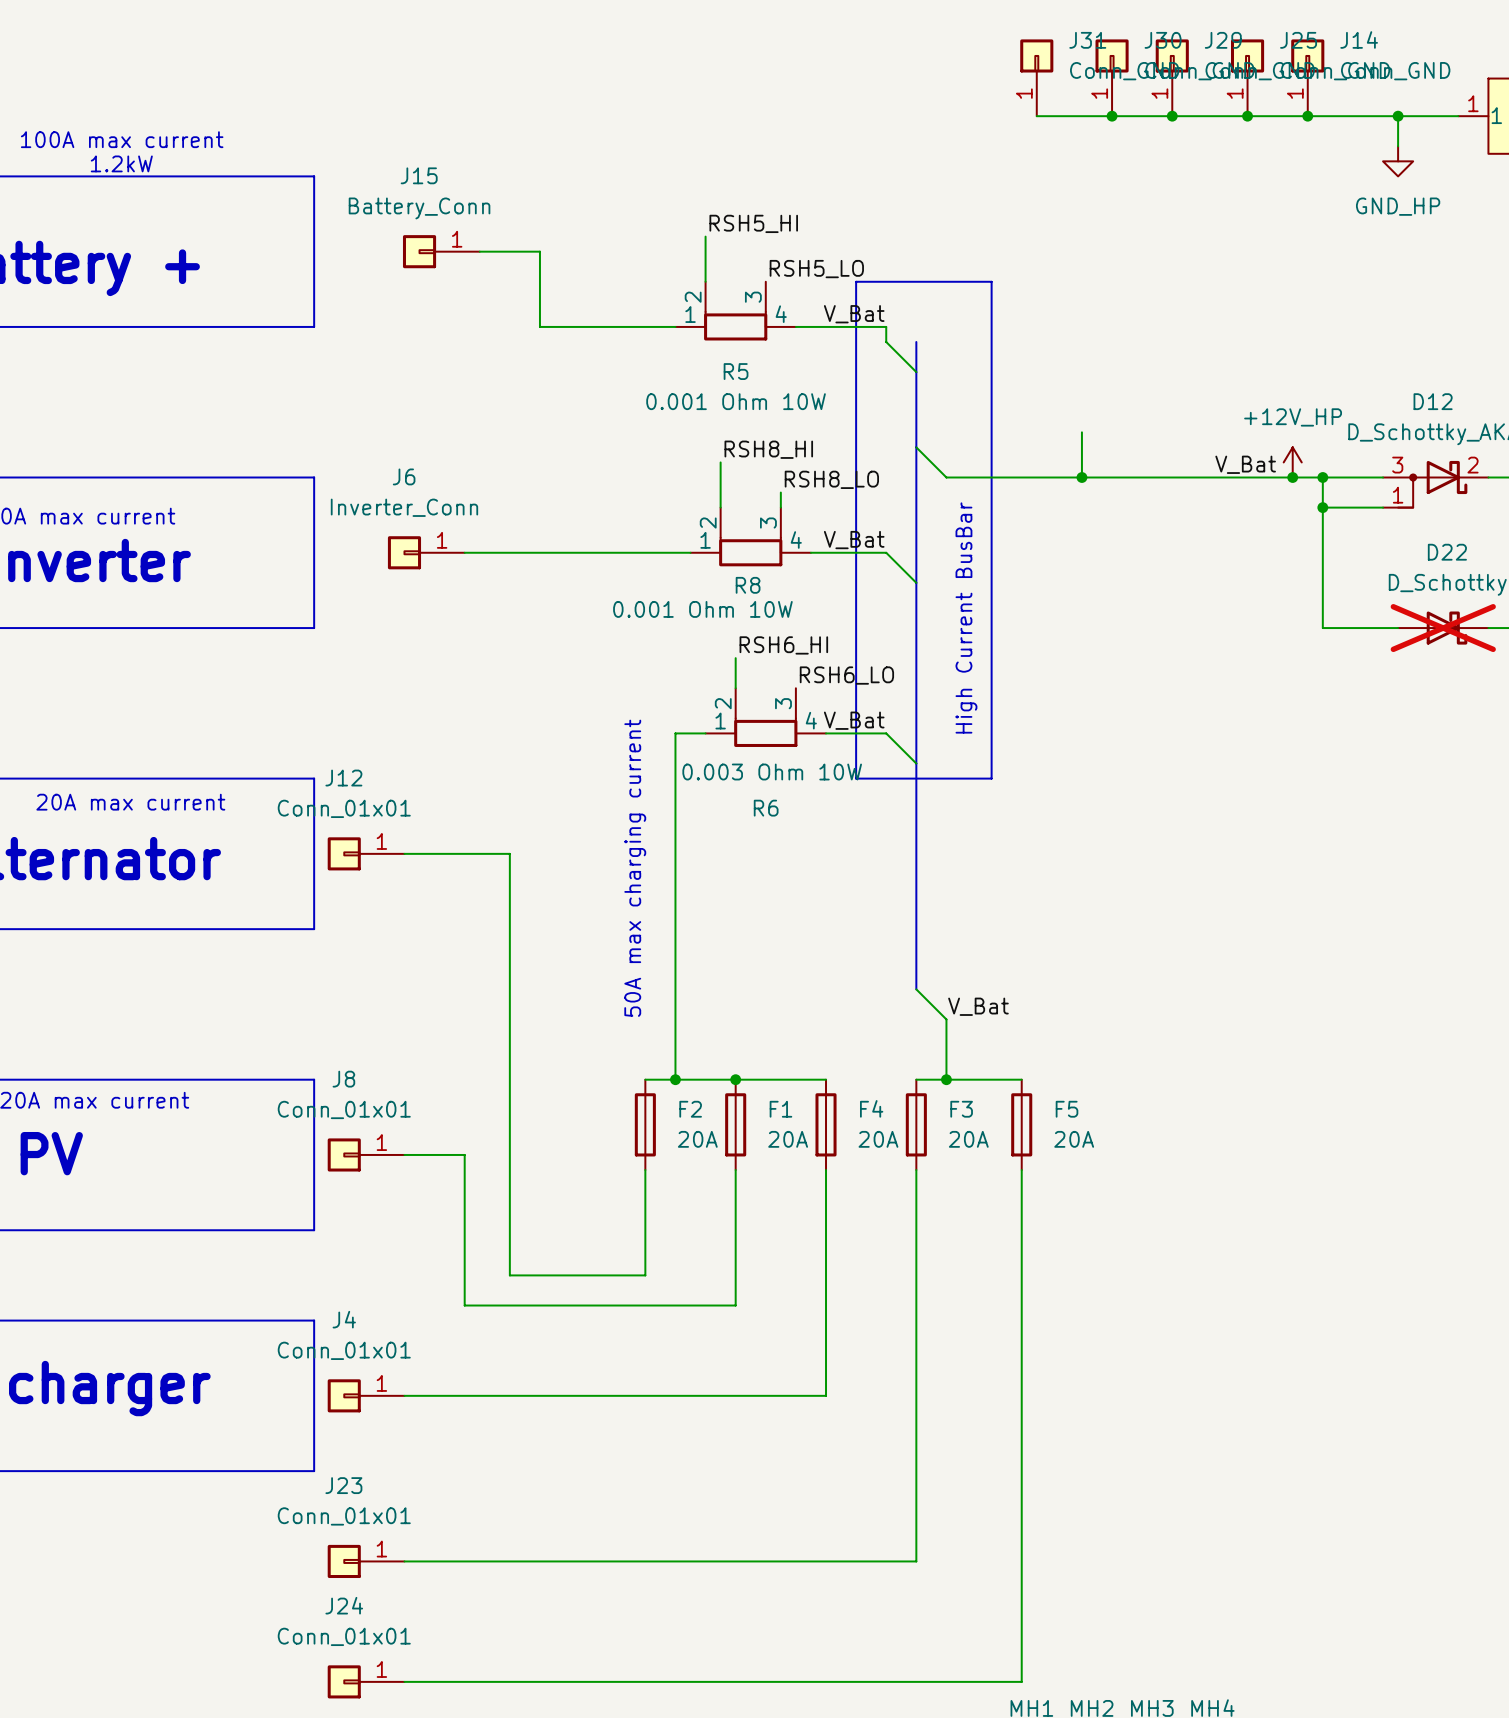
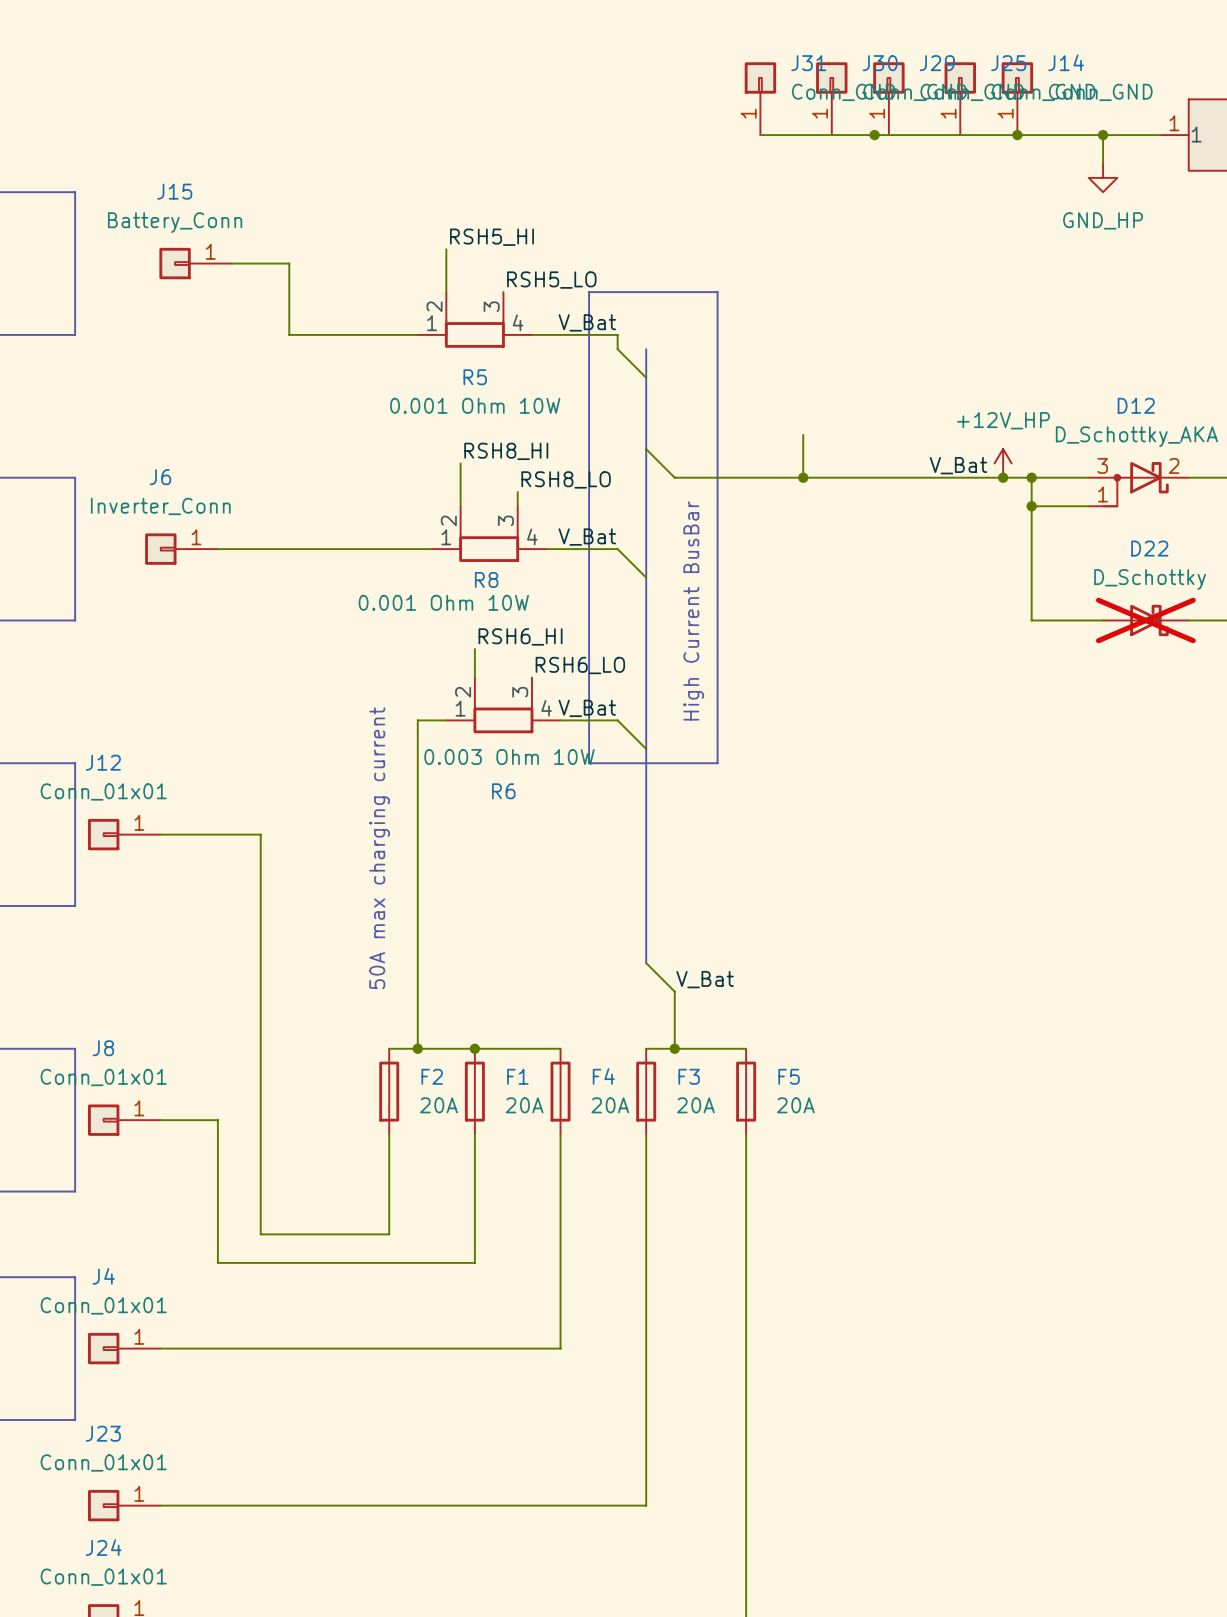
junction: (1112, 116) -> none
junction position: (1172, 116) -> (874, 135)
junction: (1247, 116) -> none

